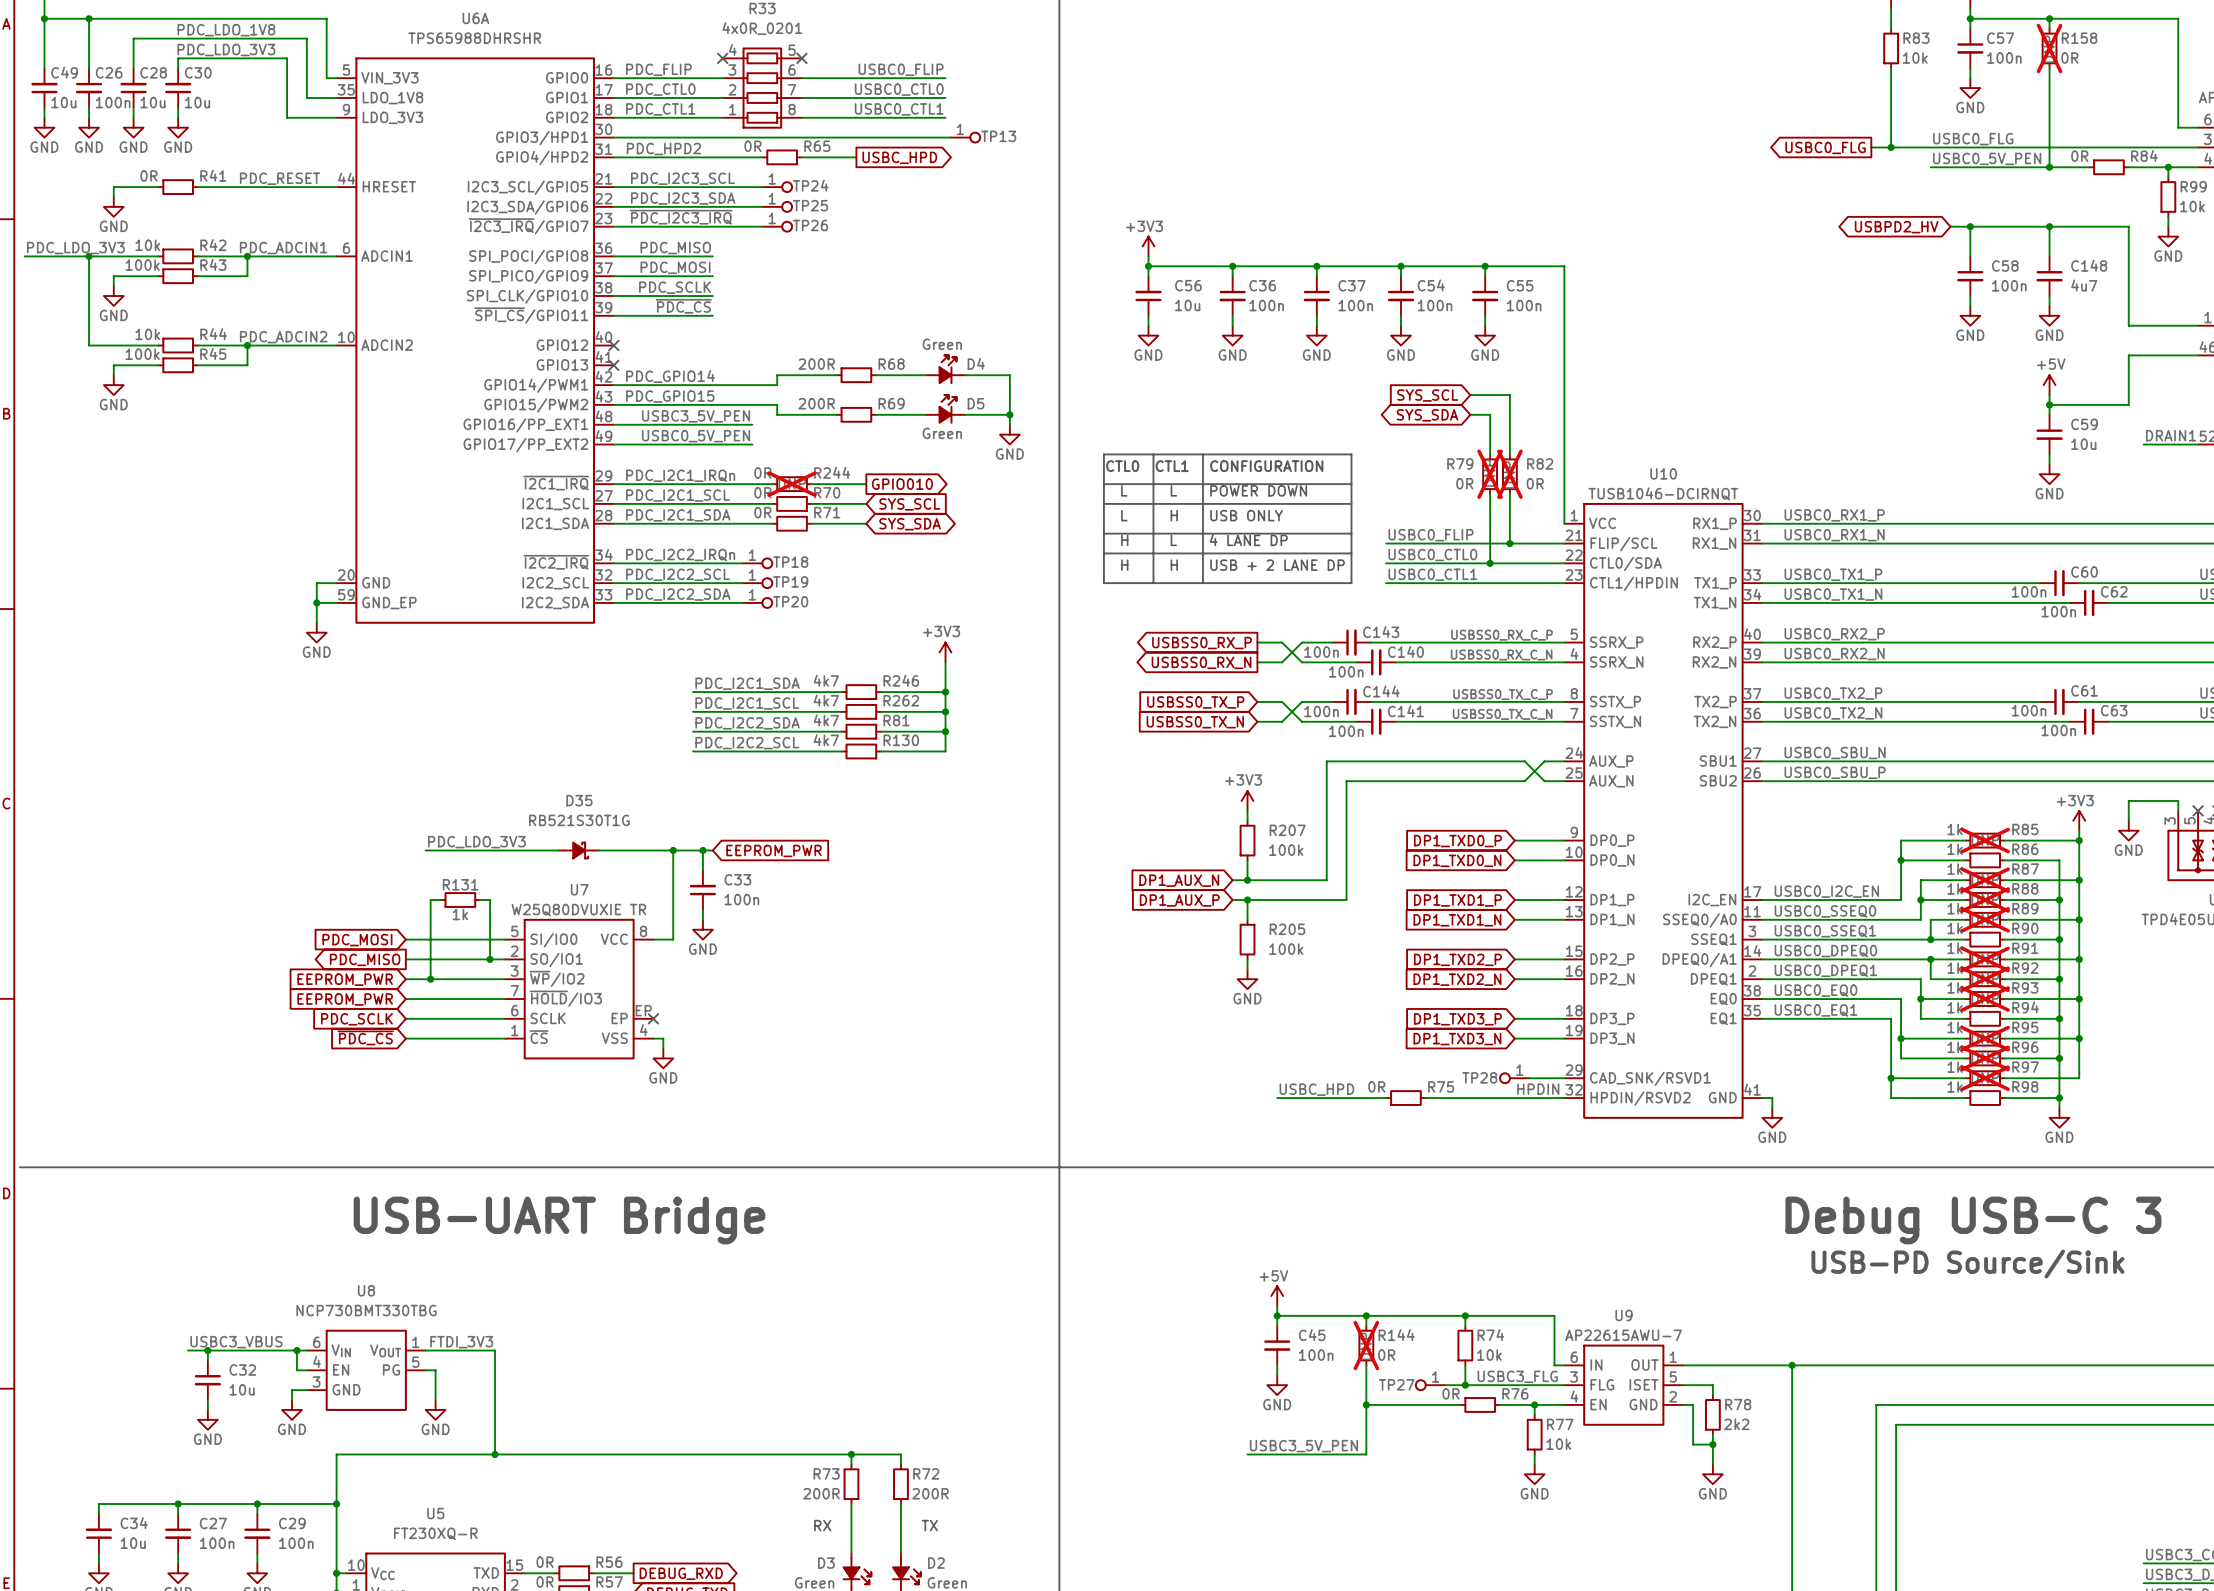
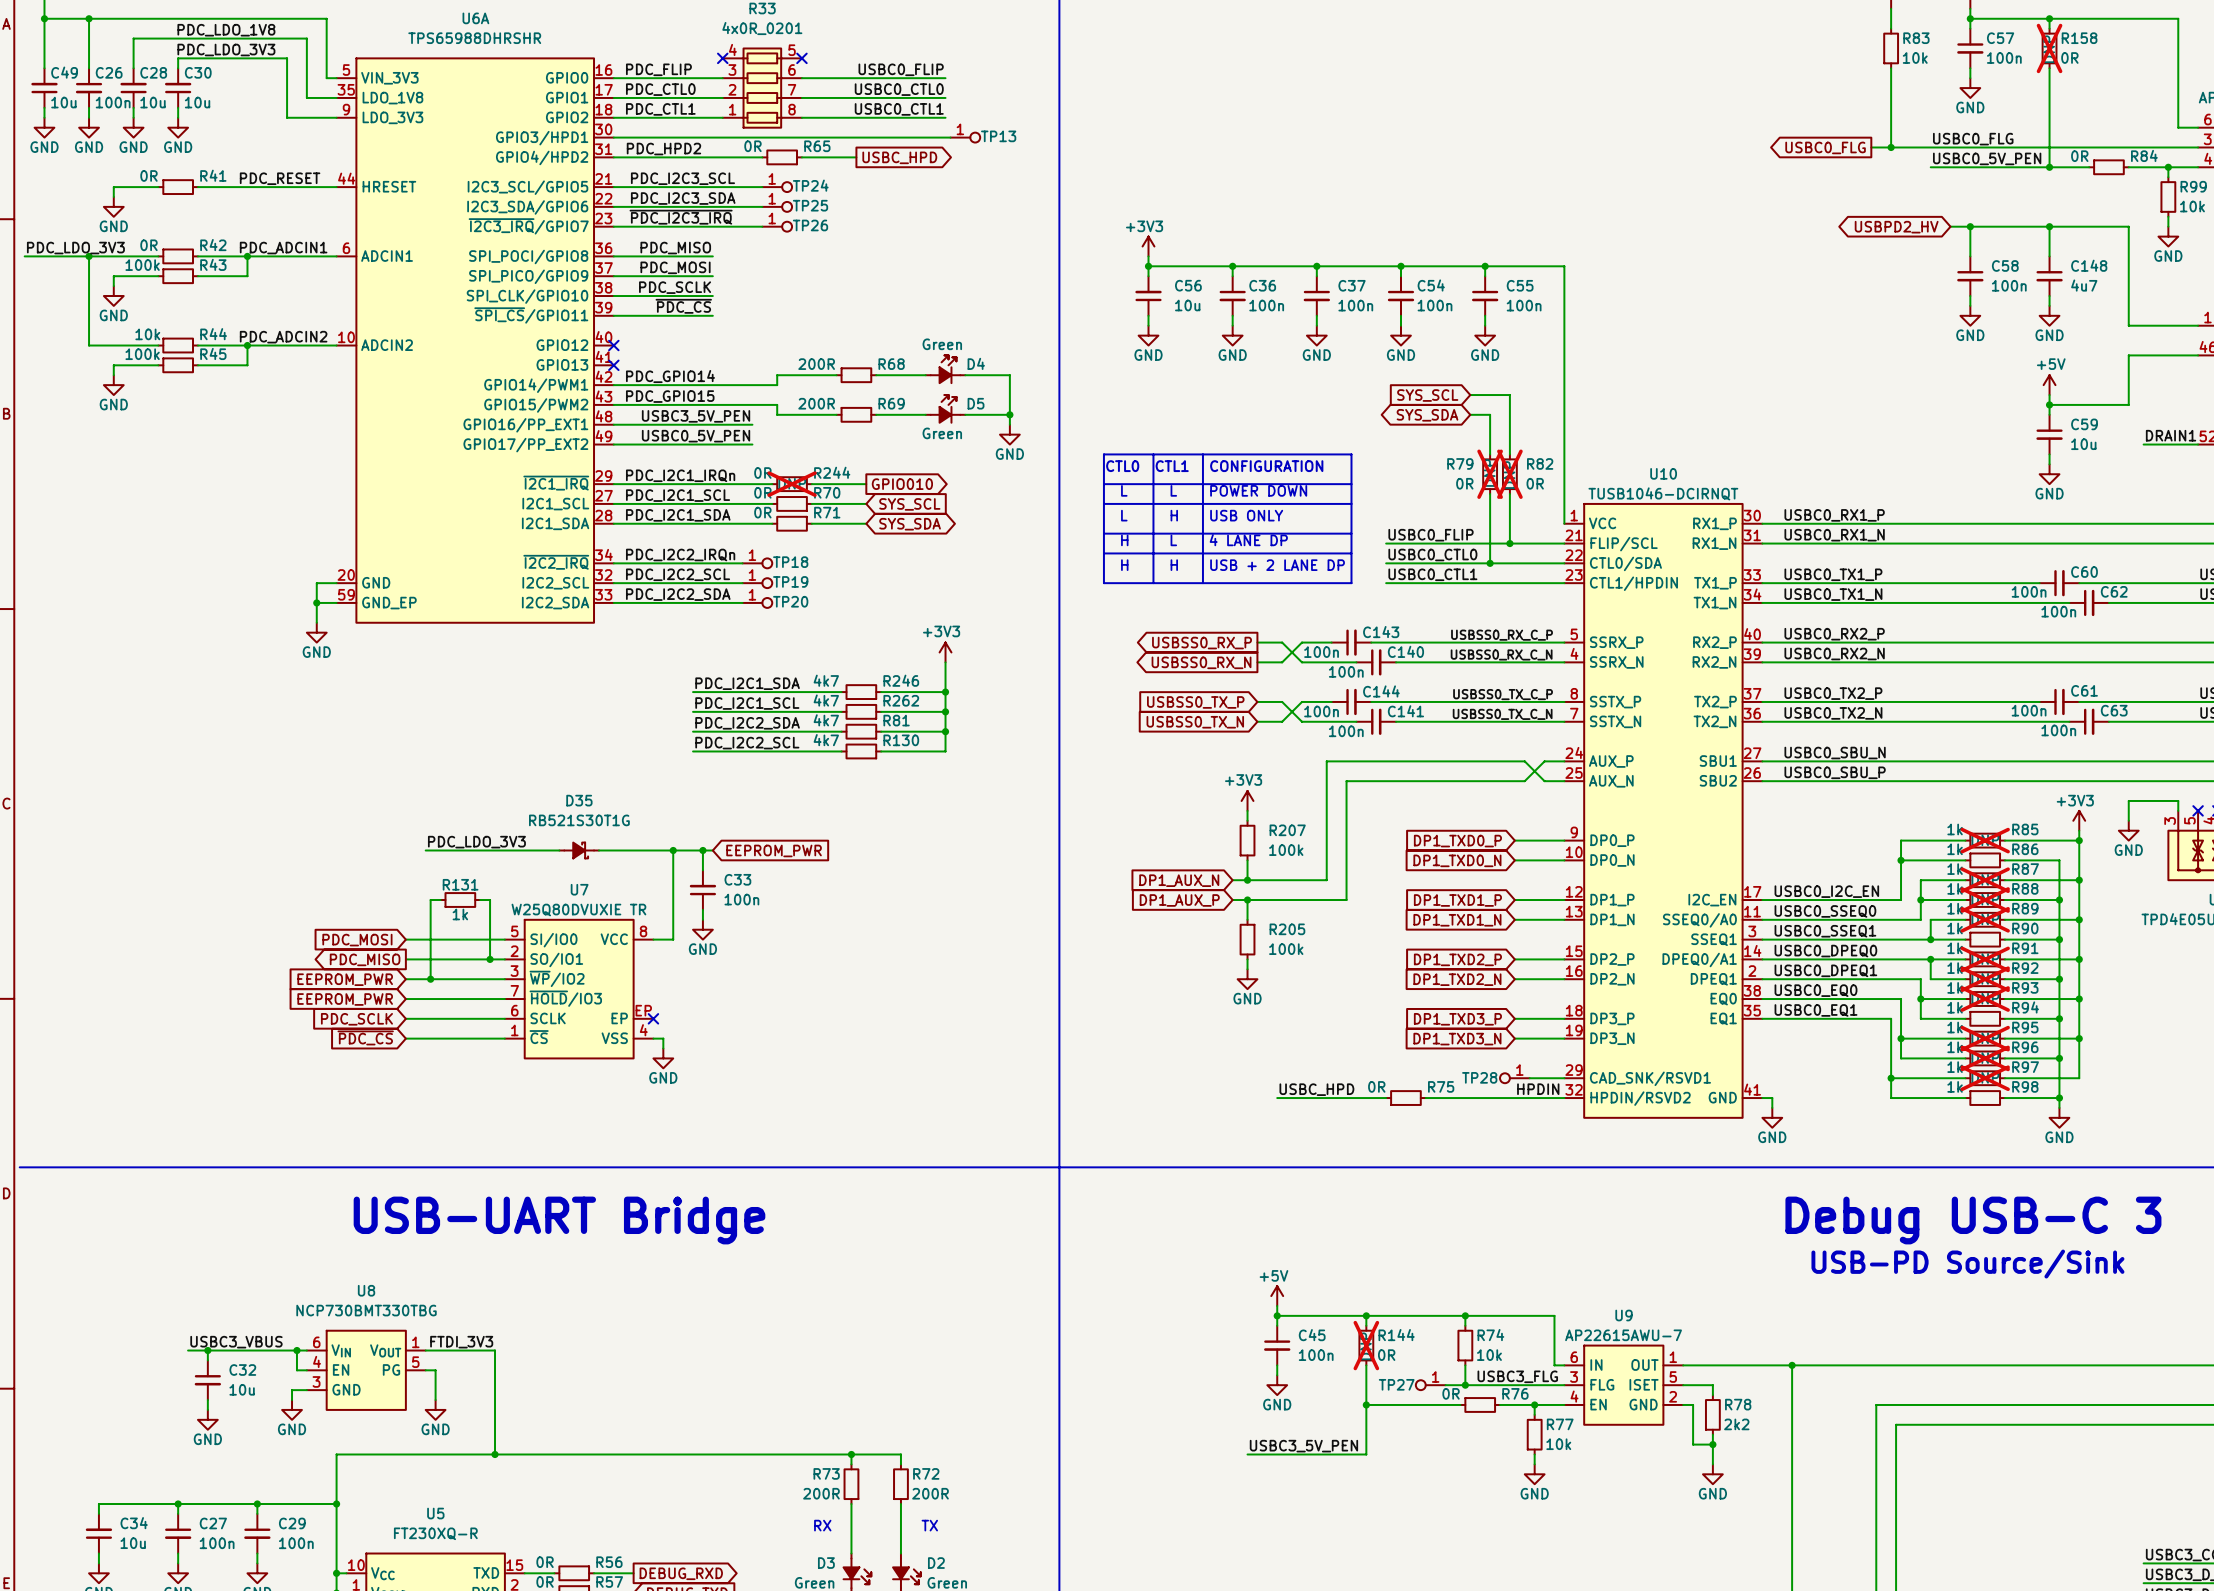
R42 text: 10k (147, 245) -> 0R (148, 245)

